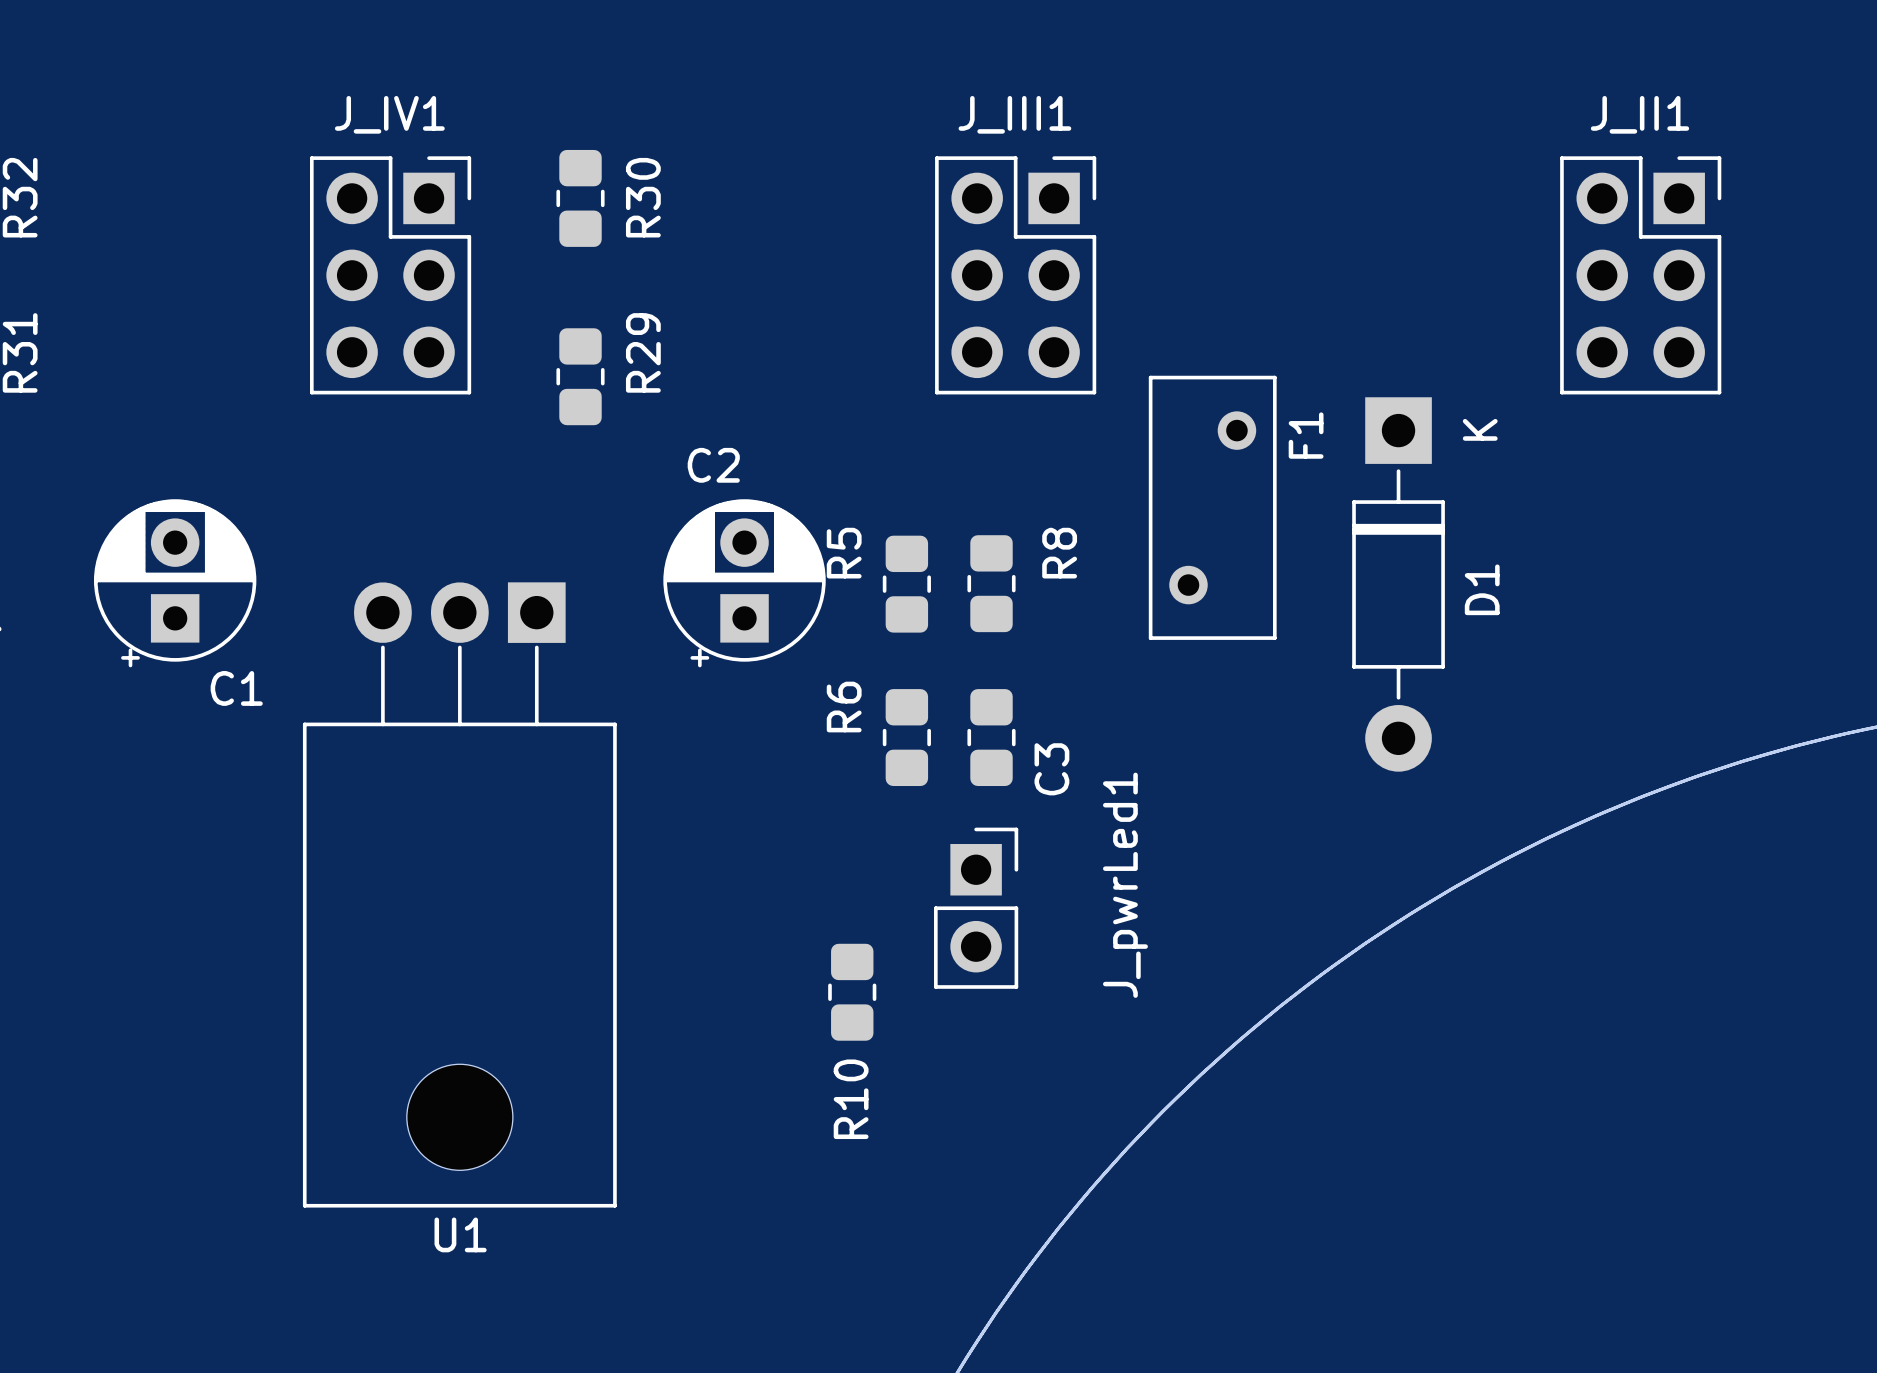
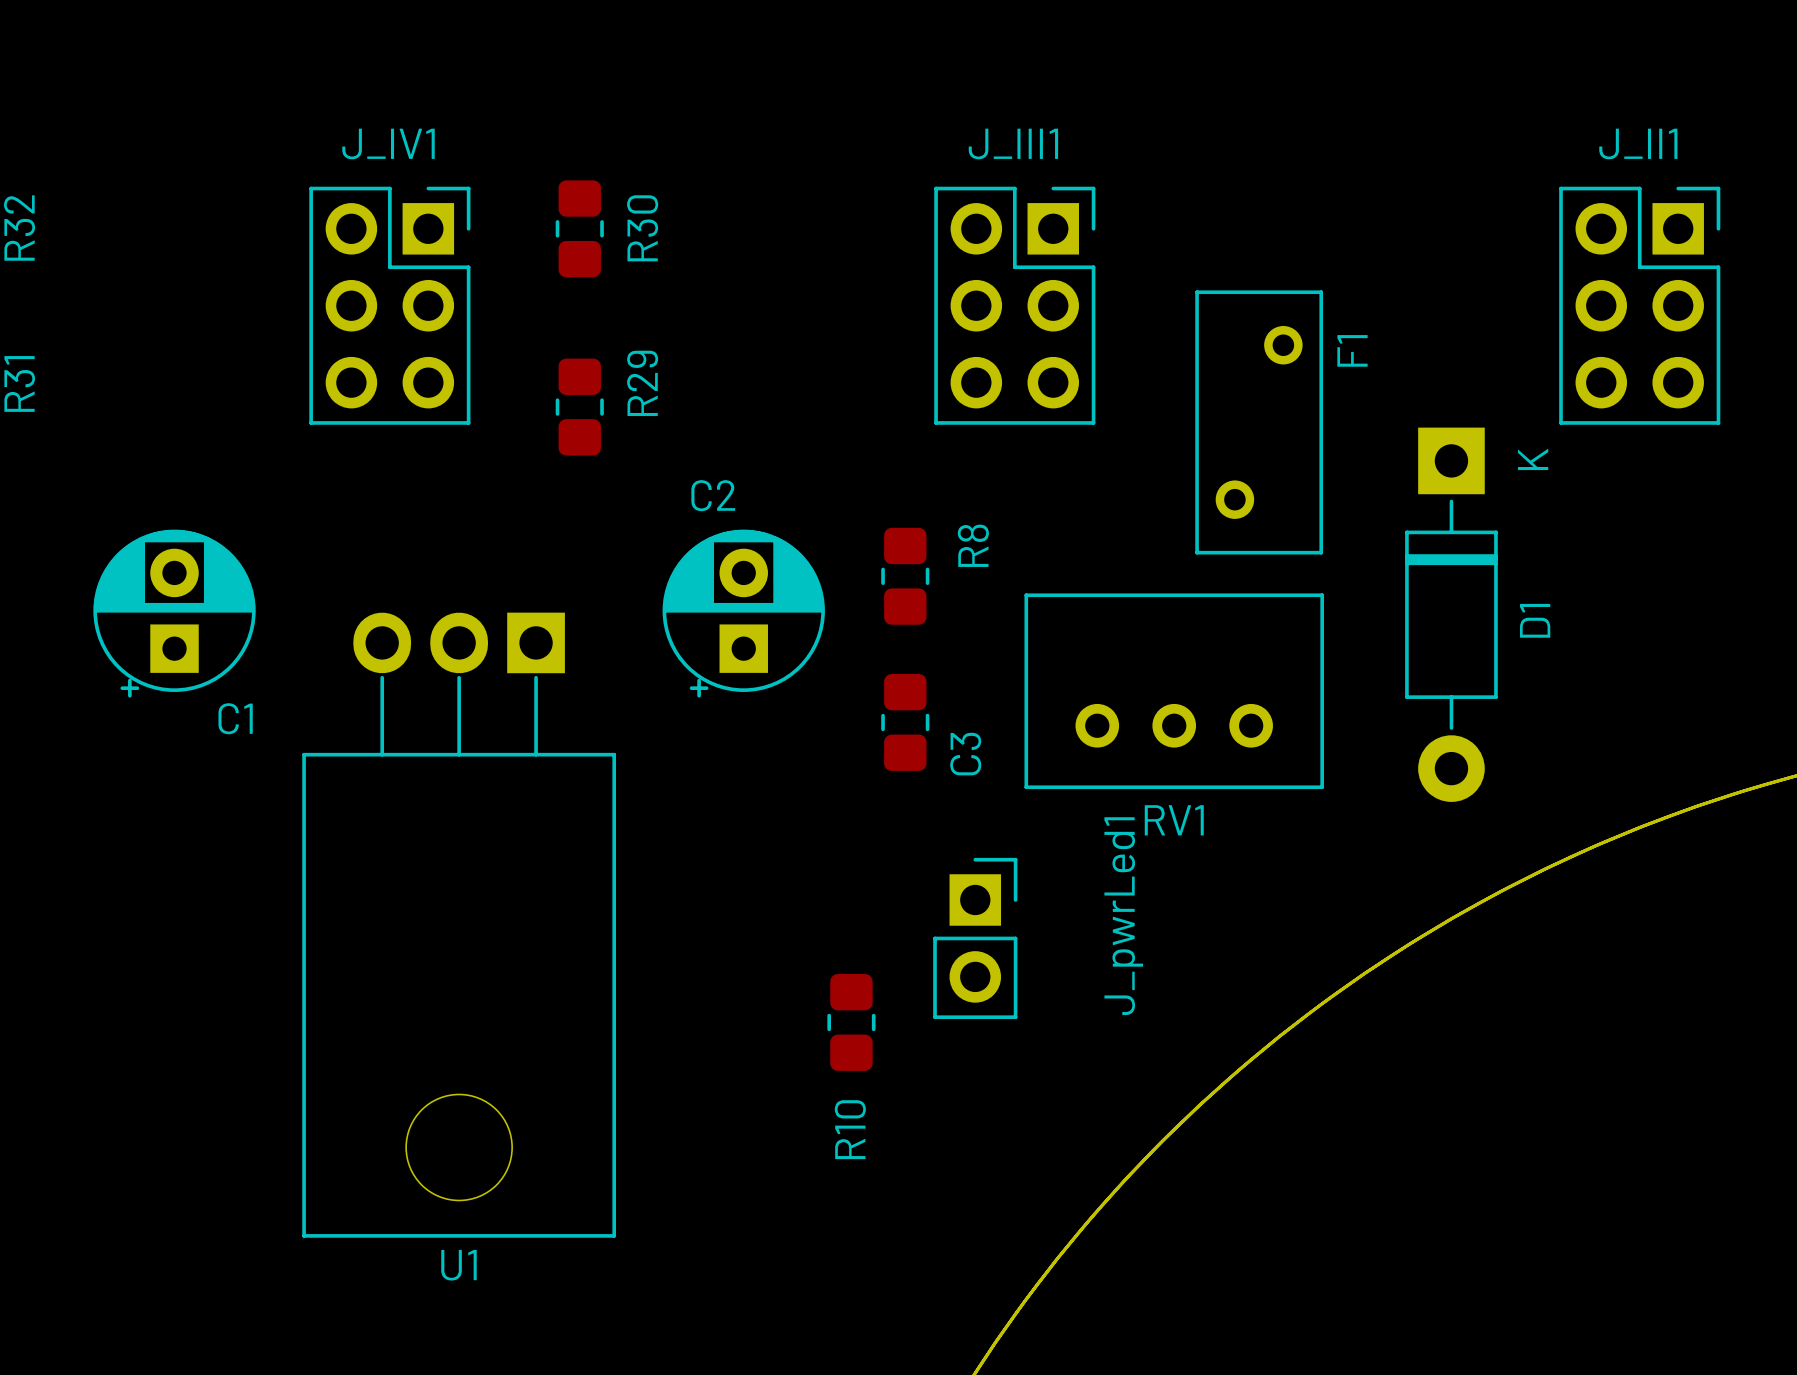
F1 position: (1212, 507) -> (1259, 422)
R8 position: (991, 583) -> (905, 576)
R5: (906, 584) -> none
D1 position: (1398, 584) -> (1451, 614)
RV1: none -> (1174, 691)
R6: (906, 737) -> none
C3 position: (991, 737) -> (905, 722)

